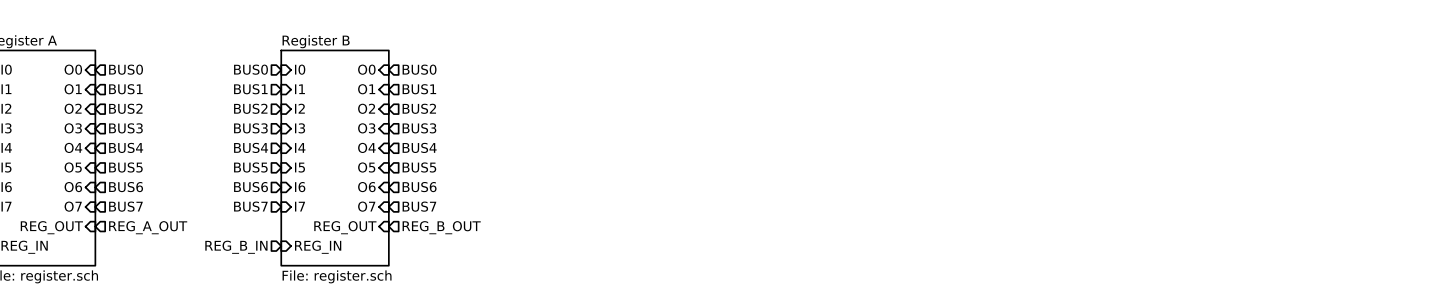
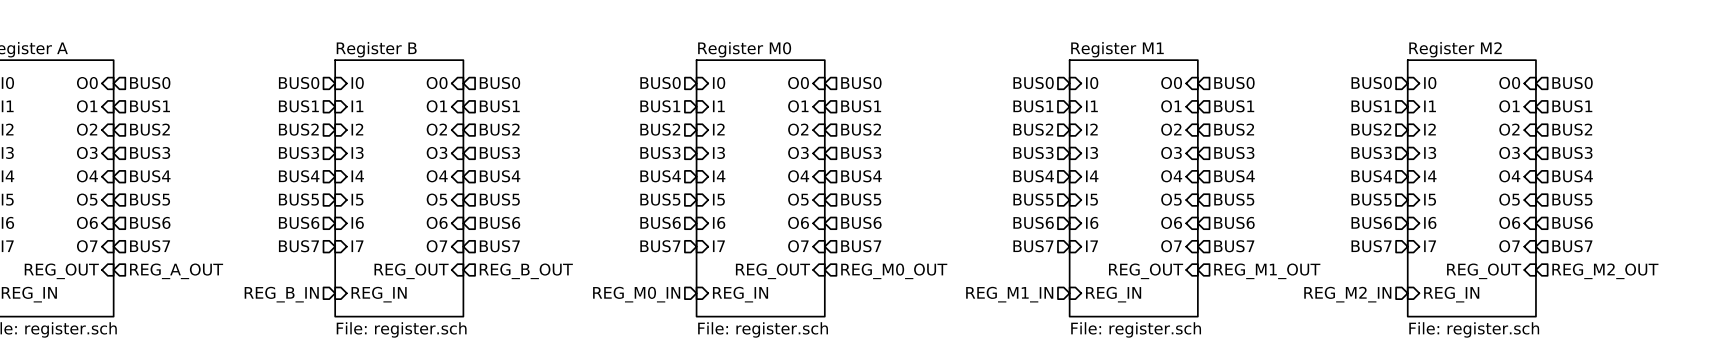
hierarchical label: none -> BUS0 (660, 83)
sheet pin: none -> I0 (719, 83)
sheet pin: none -> O0 (798, 83)
hierarchical label: none -> BUS0 (861, 83)
hierarchical label: none -> BUS0 (1033, 83)
sheet pin: none -> I0 (1092, 83)
sheet pin: none -> O0 (1171, 83)
hierarchical label: none -> BUS0 (1234, 83)
hierarchical label: none -> BUS0 (1371, 83)
sheet pin: none -> I0 (1430, 83)
sheet pin: none -> O0 (1509, 83)
hierarchical label: none -> BUS0 (1572, 83)
hierarchical label: none -> BUS1 (660, 106)
sheet pin: none -> I1 (718, 106)
sheet pin: none -> O1 (798, 106)
hierarchical label: none -> BUS1 (861, 106)
hierarchical label: none -> BUS1 (1033, 106)
sheet pin: none -> I1 (1091, 106)
sheet pin: none -> O1 (1171, 106)
hierarchical label: none -> BUS1 (1234, 106)
hierarchical label: none -> BUS1 (1371, 106)
sheet pin: none -> I1 (1430, 106)
sheet pin: none -> O1 (1509, 106)
hierarchical label: none -> BUS1 (1572, 106)
hierarchical label: none -> BUS2 (660, 129)
sheet pin: none -> I2 (718, 129)
sheet pin: none -> O2 (798, 129)
hierarchical label: none -> BUS2 (861, 129)
hierarchical label: none -> BUS2 (1033, 129)
sheet pin: none -> I2 (1091, 129)
sheet pin: none -> O2 (1171, 129)
hierarchical label: none -> BUS2 (1234, 129)
hierarchical label: none -> BUS2 (1371, 129)
sheet pin: none -> I2 (1429, 129)
sheet pin: none -> O2 (1509, 129)
hierarchical label: none -> BUS2 (1572, 129)
hierarchical label: none -> BUS3 (660, 152)
sheet pin: none -> I3 (718, 152)
sheet pin: none -> O3 (798, 152)
hierarchical label: none -> BUS3 (861, 152)
hierarchical label: none -> BUS3 (1033, 152)
sheet pin: none -> I3 (1092, 152)
sheet pin: none -> O3 (1171, 152)
hierarchical label: none -> BUS3 (1234, 152)
hierarchical label: none -> BUS3 (1371, 152)
sheet pin: none -> I3 (1430, 152)
sheet pin: none -> O3 (1509, 152)
hierarchical label: none -> BUS3 (1572, 152)
hierarchical label: none -> BUS4 (660, 176)
sheet pin: none -> I4 (719, 176)
sheet pin: none -> O4 (798, 176)
hierarchical label: none -> BUS4 (861, 176)
hierarchical label: none -> BUS4 (1033, 176)
sheet pin: none -> I4 (1092, 176)
sheet pin: none -> O4 (1171, 176)
hierarchical label: none -> BUS4 (1234, 176)
hierarchical label: none -> BUS4 (1371, 176)
sheet pin: none -> I4 (1430, 176)
sheet pin: none -> O4 (1509, 176)
hierarchical label: none -> BUS4 (1572, 176)
sheet Register M0: none -> File: register.sch (760, 188)
sheet Register M1: none -> File: register.sch (1133, 188)
sheet Register M2: none -> File: register.sch (1471, 188)
hierarchical label: none -> BUS5 (660, 199)
sheet pin: none -> I5 (718, 199)
sheet pin: none -> O5 (798, 199)
hierarchical label: none -> BUS5 (861, 199)
hierarchical label: none -> BUS5 (1033, 199)
sheet pin: none -> I5 (1091, 199)
sheet pin: none -> O5 (1171, 199)
hierarchical label: none -> BUS5 (1234, 199)
hierarchical label: none -> BUS5 (1371, 199)
sheet pin: none -> I5 (1430, 199)
sheet pin: none -> O5 (1509, 199)
hierarchical label: none -> BUS5 (1572, 199)
hierarchical label: none -> BUS6 (660, 222)
sheet pin: none -> I6 (719, 222)
sheet pin: none -> O6 (798, 222)
hierarchical label: none -> BUS6 (861, 222)
hierarchical label: none -> BUS6 (1033, 222)
sheet pin: none -> I6 (1092, 222)
sheet pin: none -> O6 (1171, 222)
hierarchical label: none -> BUS6 (1234, 222)
hierarchical label: none -> BUS6 (1371, 222)
sheet pin: none -> I6 (1430, 222)
sheet pin: none -> O6 (1509, 222)
hierarchical label: none -> BUS6 (1572, 222)
hierarchical label: none -> BUS7 (660, 246)
sheet pin: none -> I7 (718, 246)
sheet pin: none -> O7 (798, 246)
hierarchical label: none -> BUS7 (861, 246)
hierarchical label: none -> BUS7 (1033, 246)
sheet pin: none -> I7 (1091, 246)
sheet pin: none -> O7 (1171, 246)
hierarchical label: none -> BUS7 (1234, 246)
hierarchical label: none -> BUS7 (1371, 246)
sheet pin: none -> I7 (1430, 246)
sheet pin: none -> O7 (1509, 246)
hierarchical label: none -> BUS7 (1572, 246)
sheet pin: none -> REG_OUT (772, 271)
hierarchical label: none -> REG_M0_OUT (894, 271)
sheet pin: none -> REG_OUT (1146, 271)
hierarchical label: none -> REG_M1_OUT (1267, 271)
sheet pin: none -> REG_OUT (1484, 271)
hierarchical label: none -> REG_M2_OUT (1605, 271)
hierarchical label: none -> REG_M0_IN (636, 294)
sheet pin: none -> REG_IN (740, 294)
hierarchical label: none -> REG_M1_IN (1009, 294)
sheet pin: none -> REG_IN (1113, 294)
hierarchical label: none -> REG_M2_IN (1347, 294)
sheet pin: none -> REG_IN (1451, 294)

